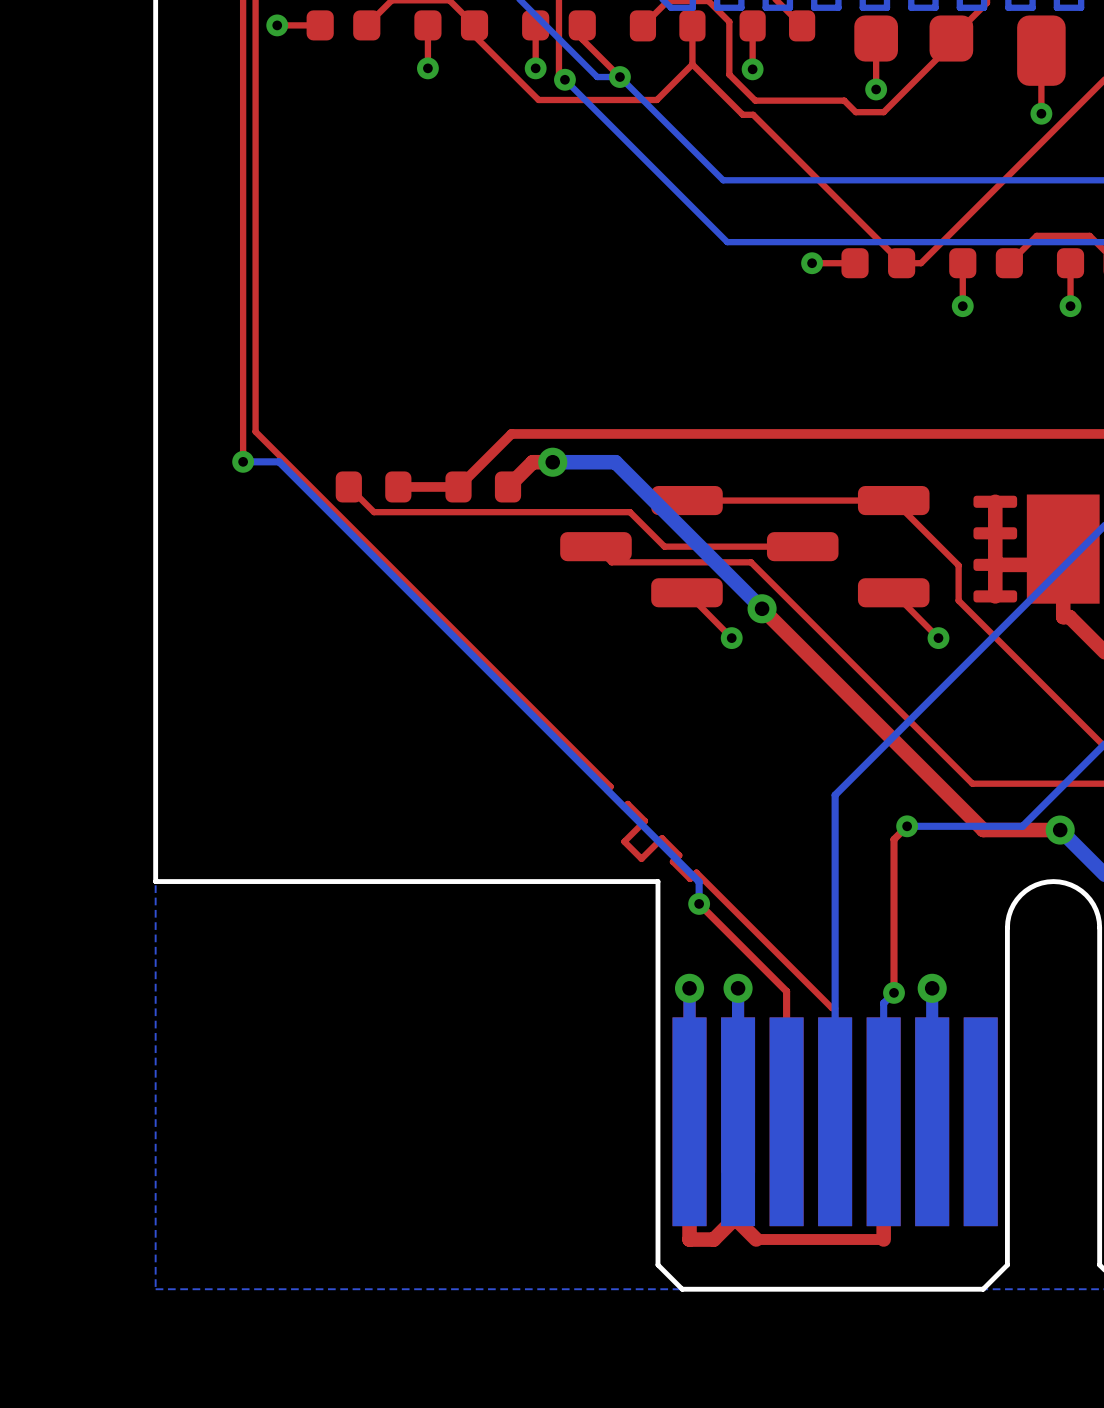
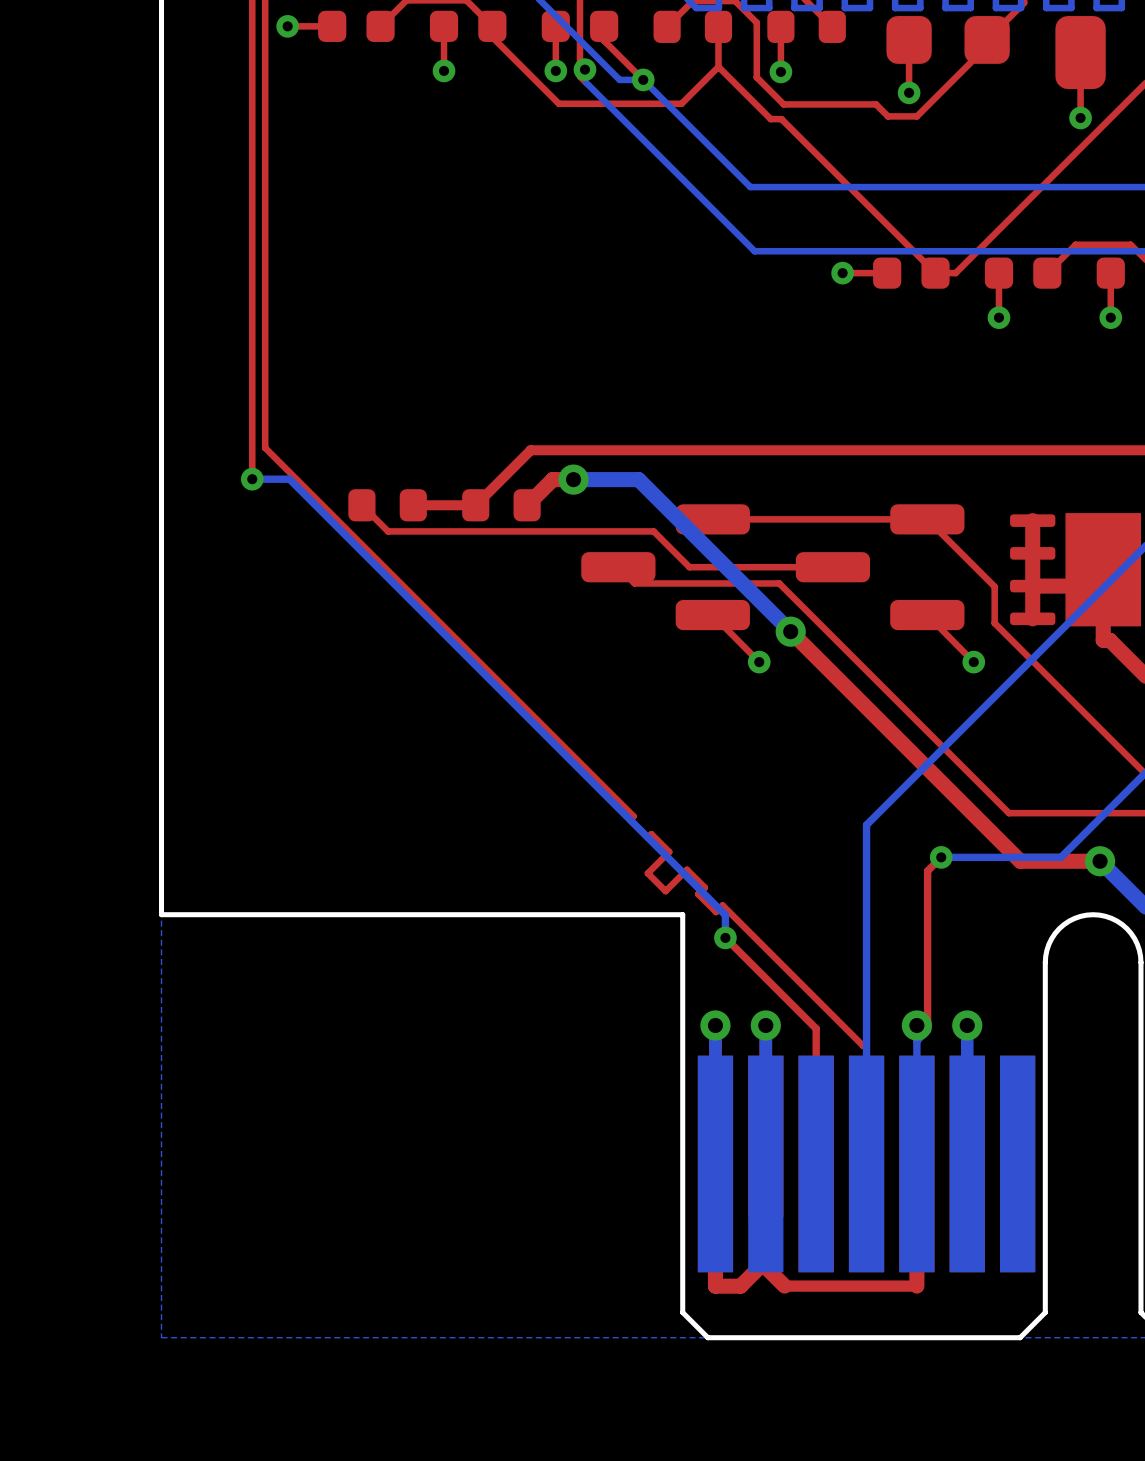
via position: (564, 79) -> (584, 69)
via size: [883, 981, 905, 1004] -> [901, 1010, 933, 1041]

